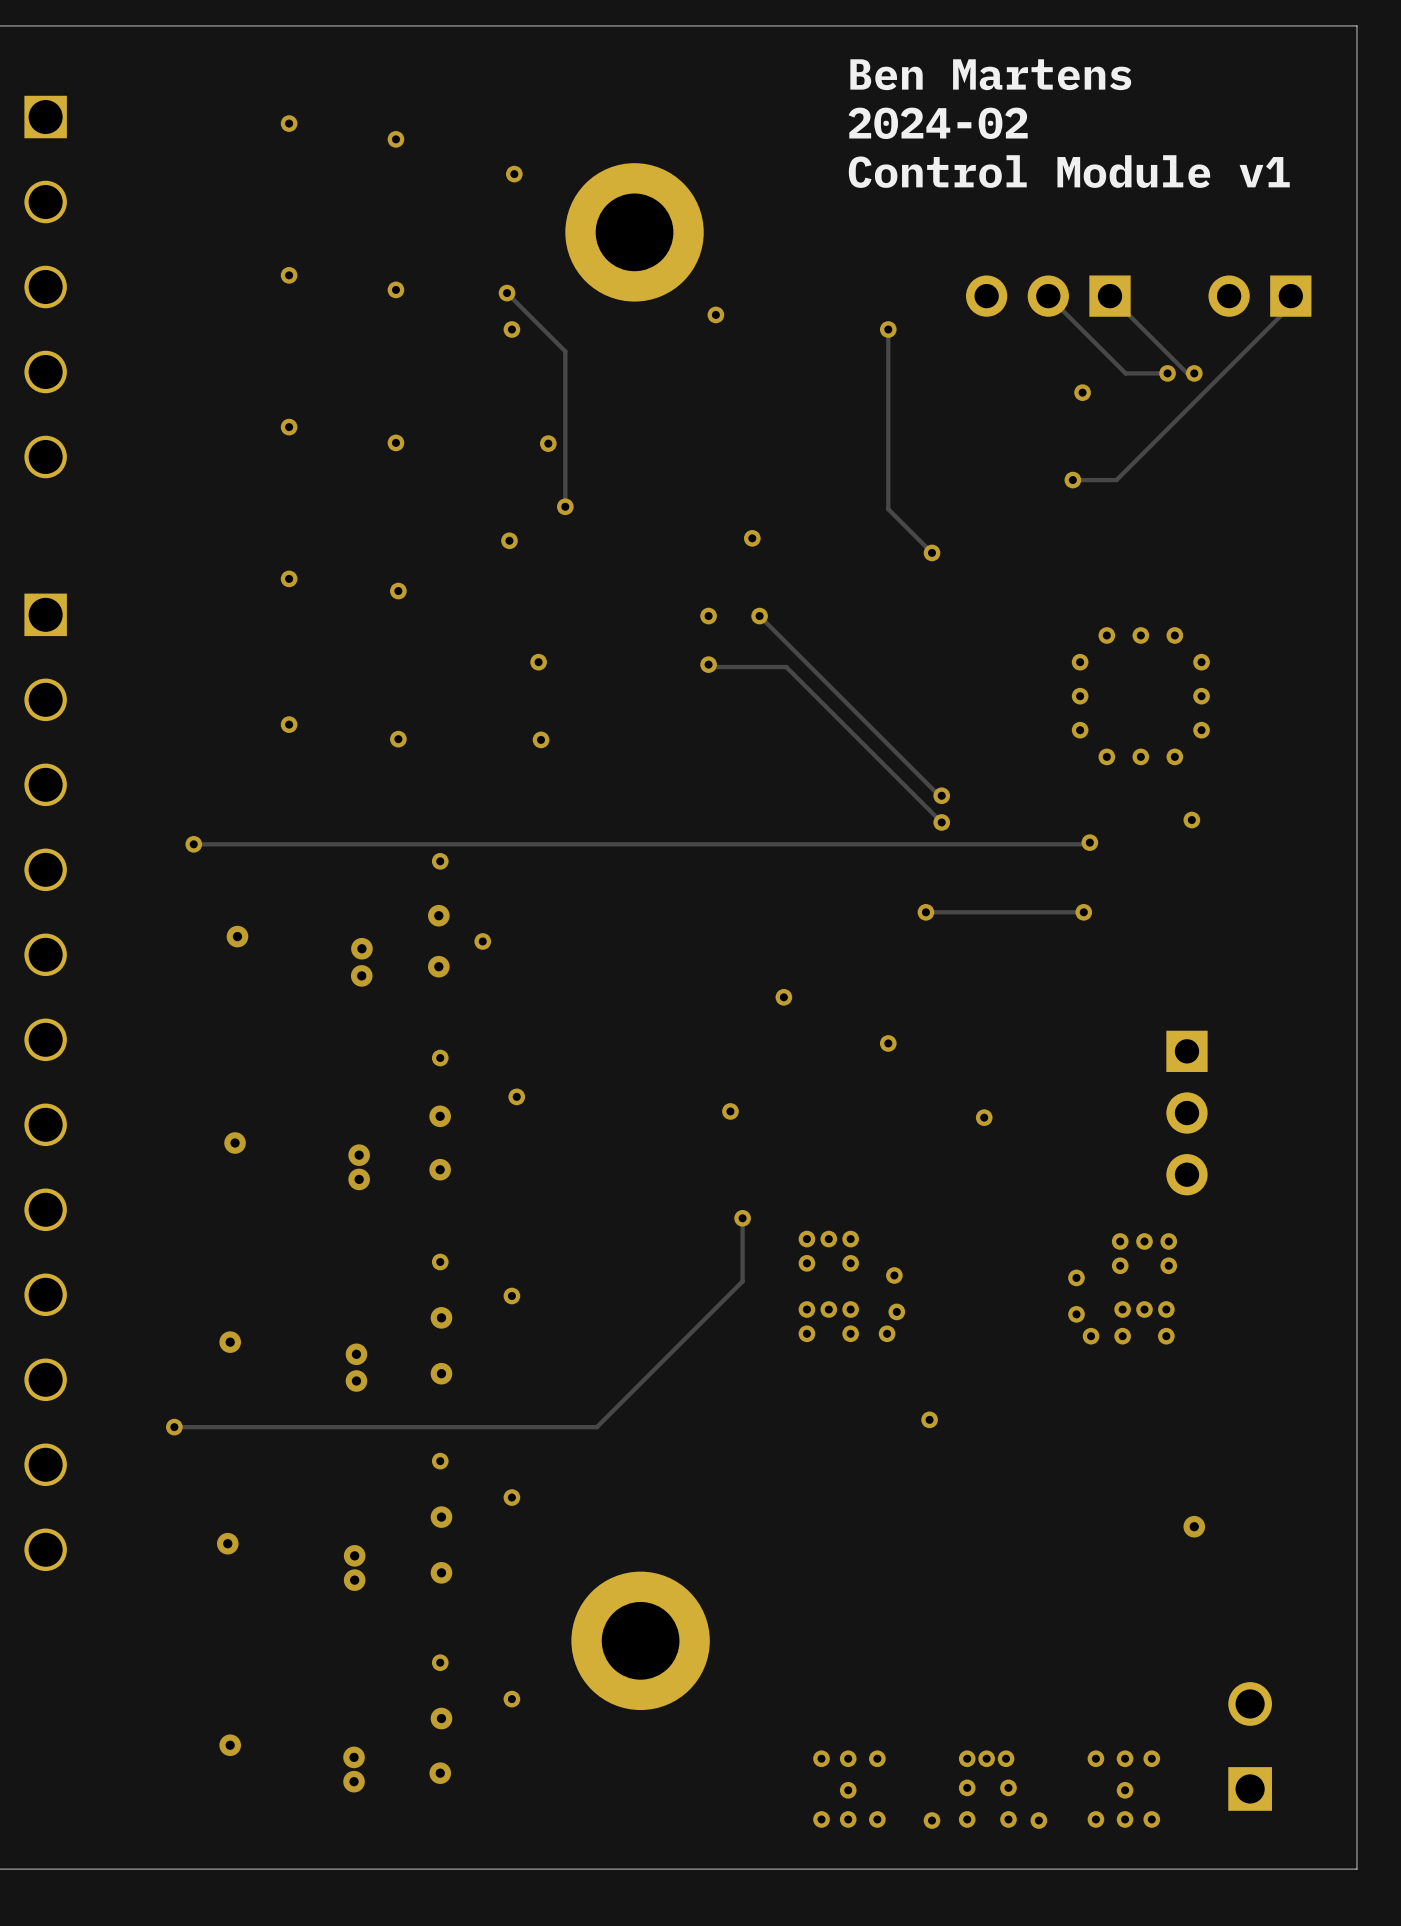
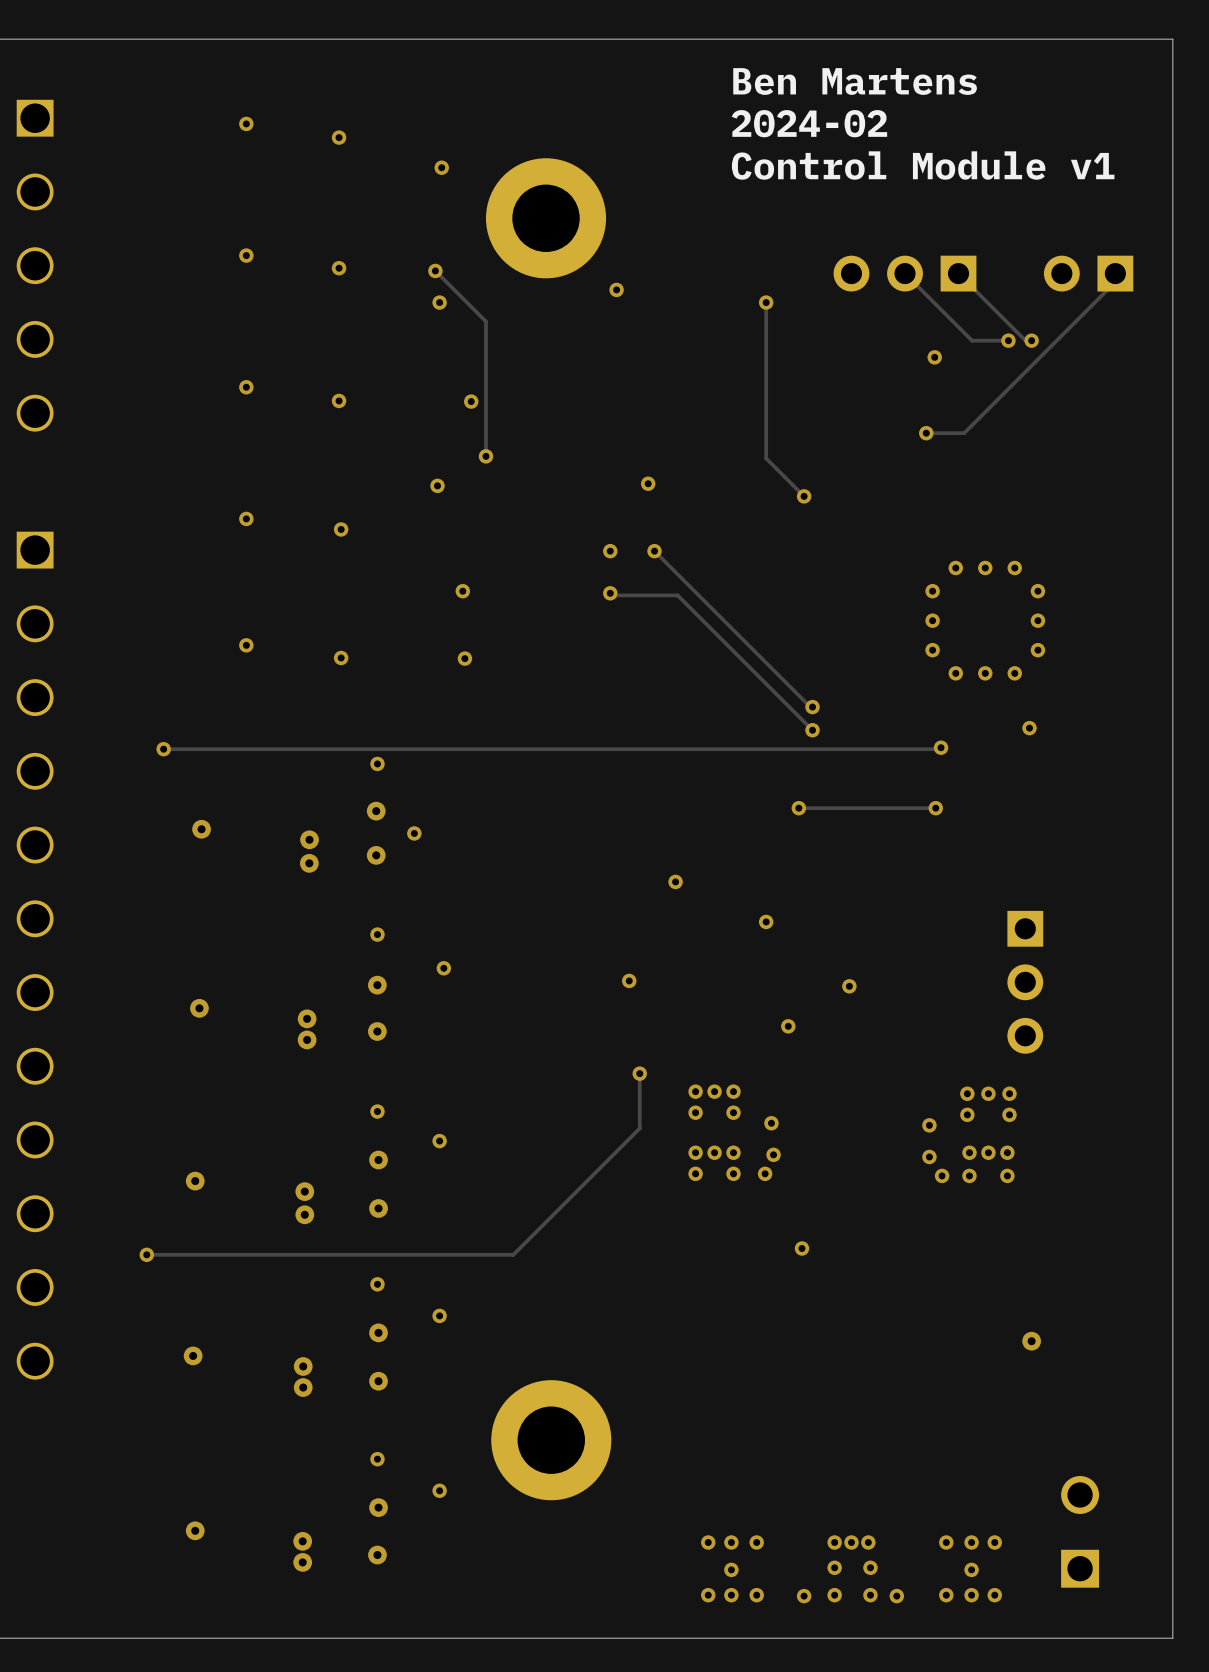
via: none -> (788, 1026)

